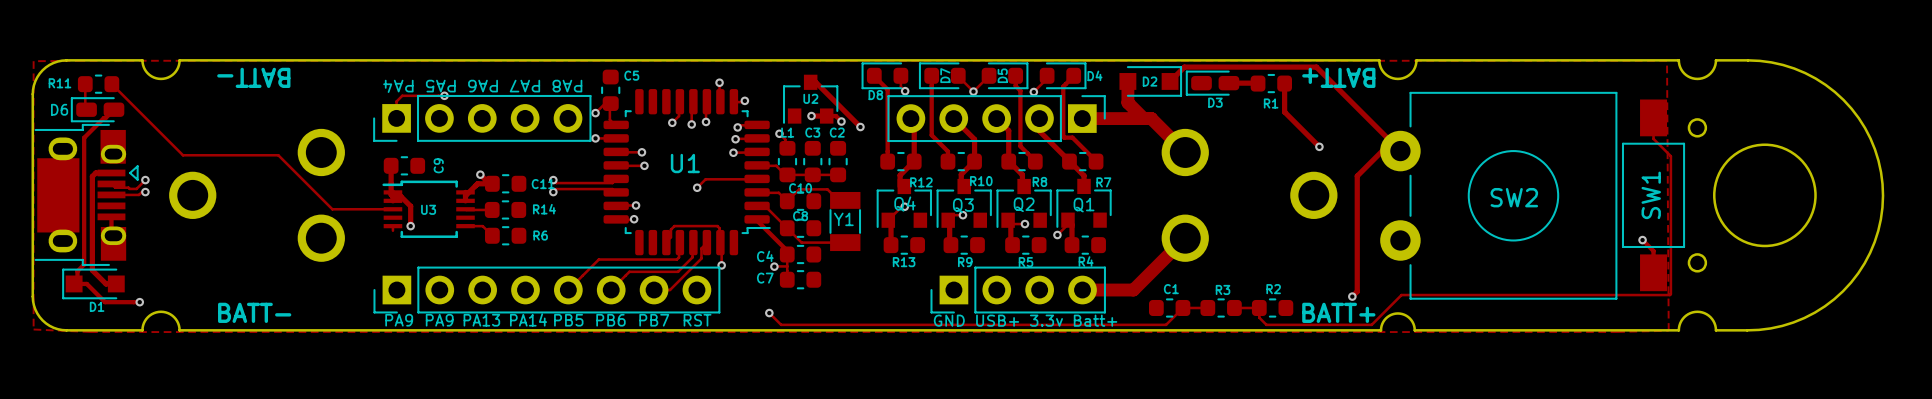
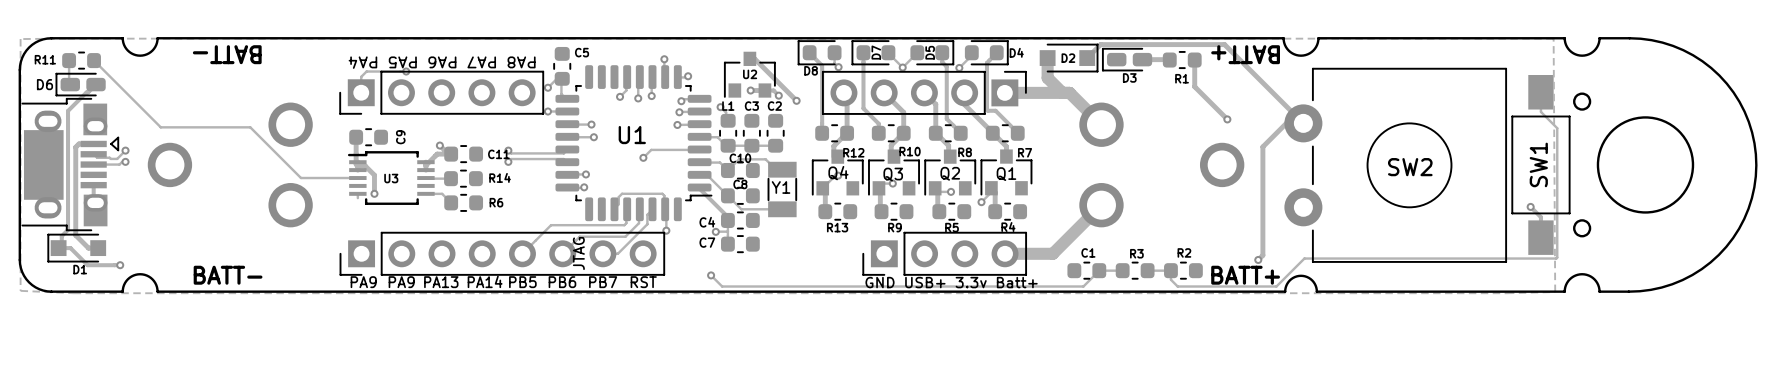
text: none -> JTAG (578, 253)

